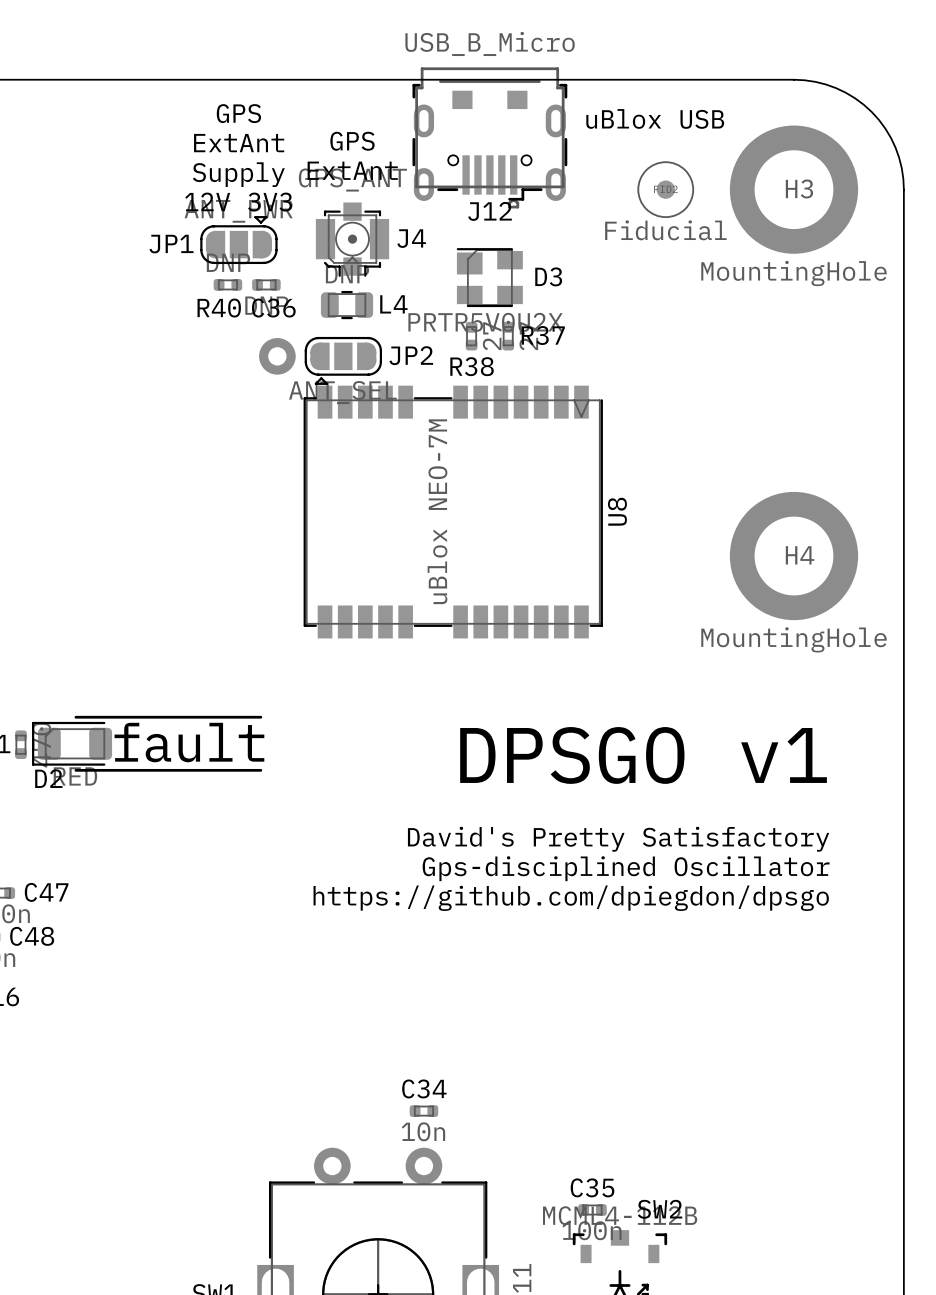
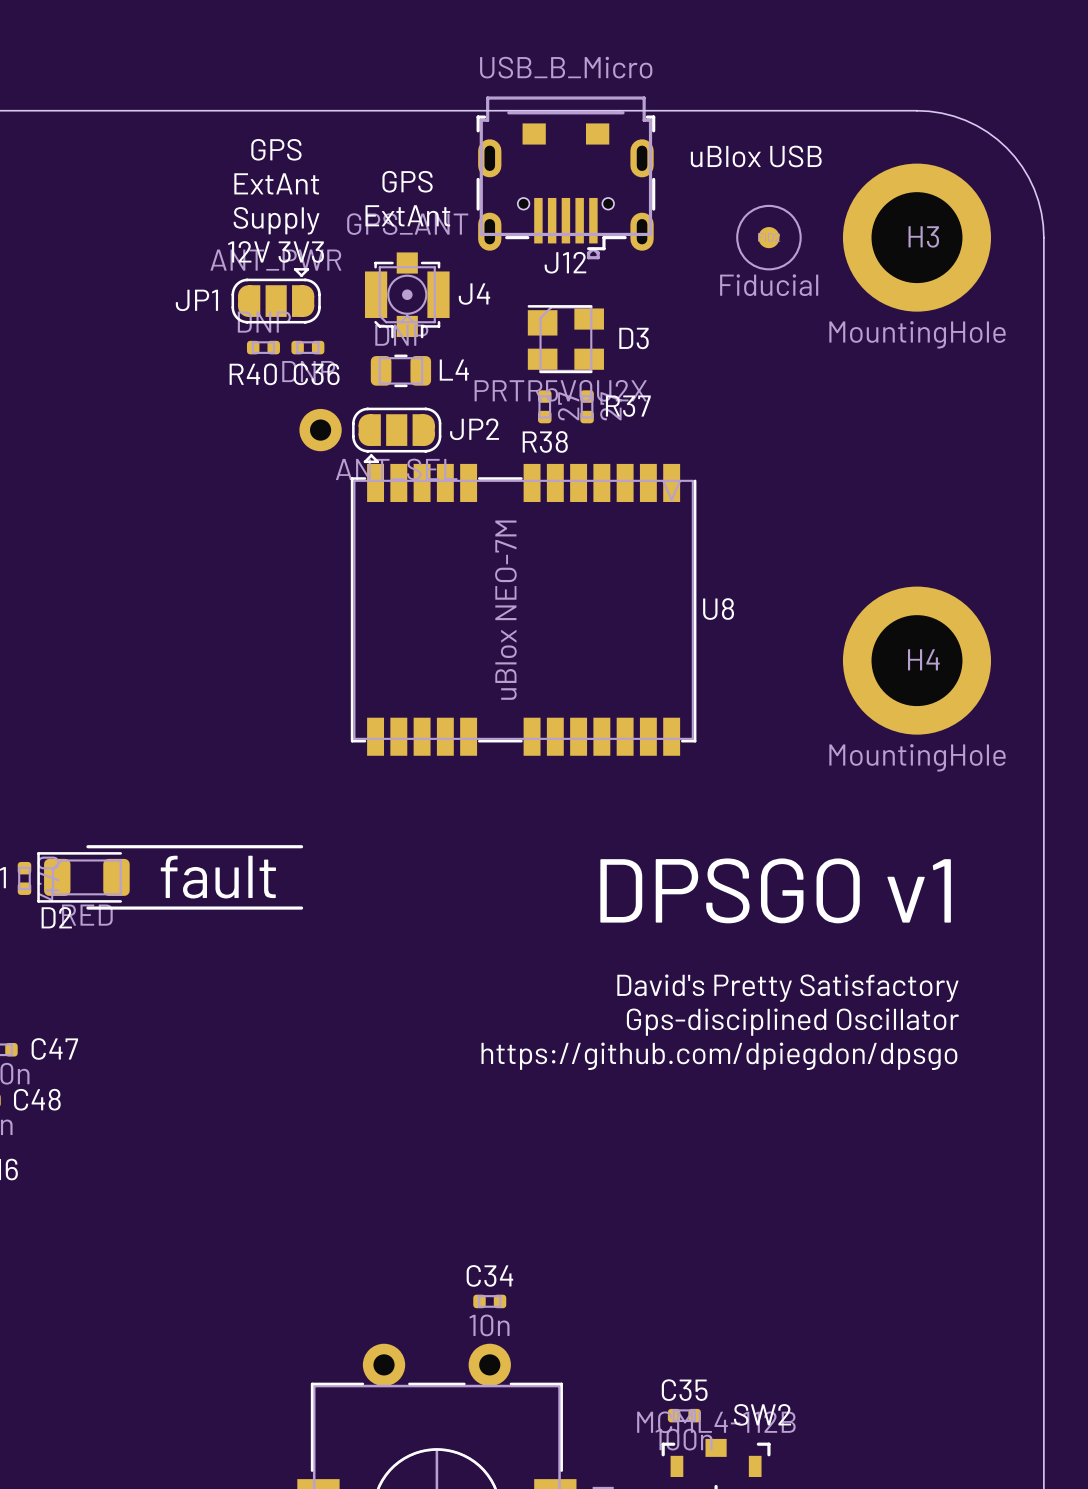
U8 name rotation: 0° (617, 511) -> 90° clockwise (718, 609)

